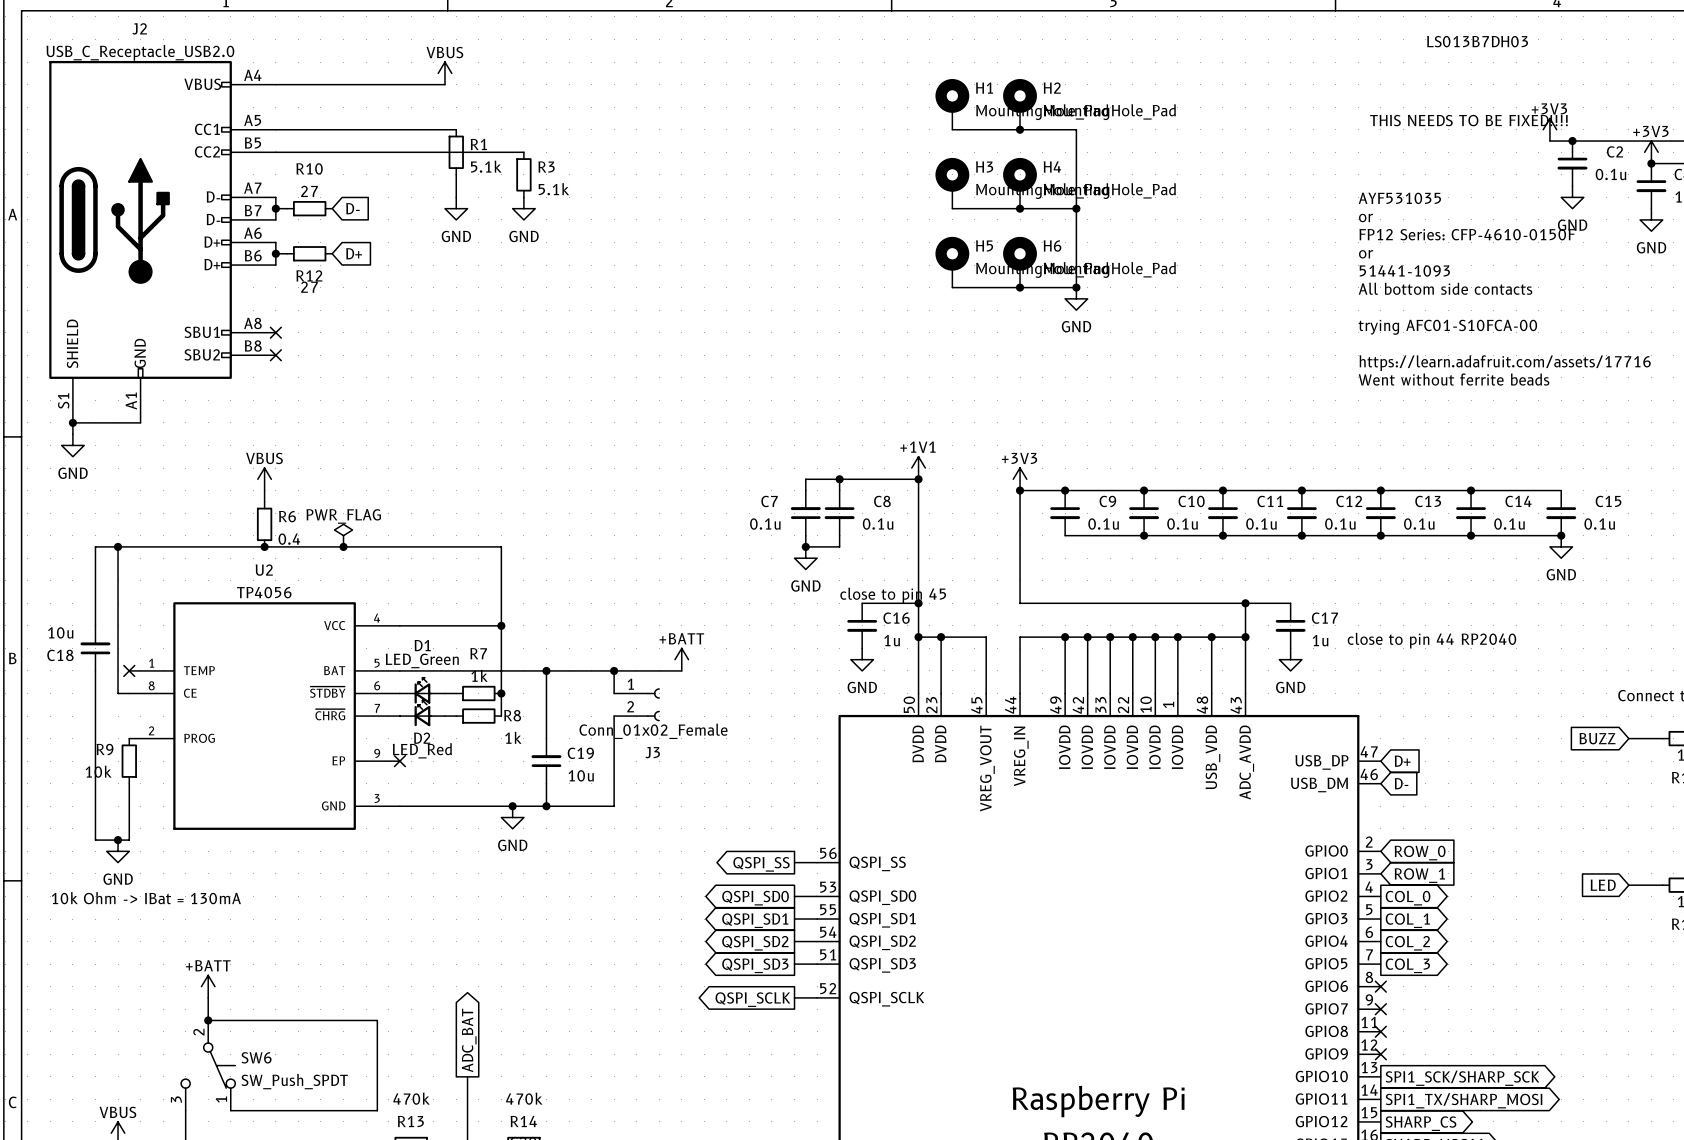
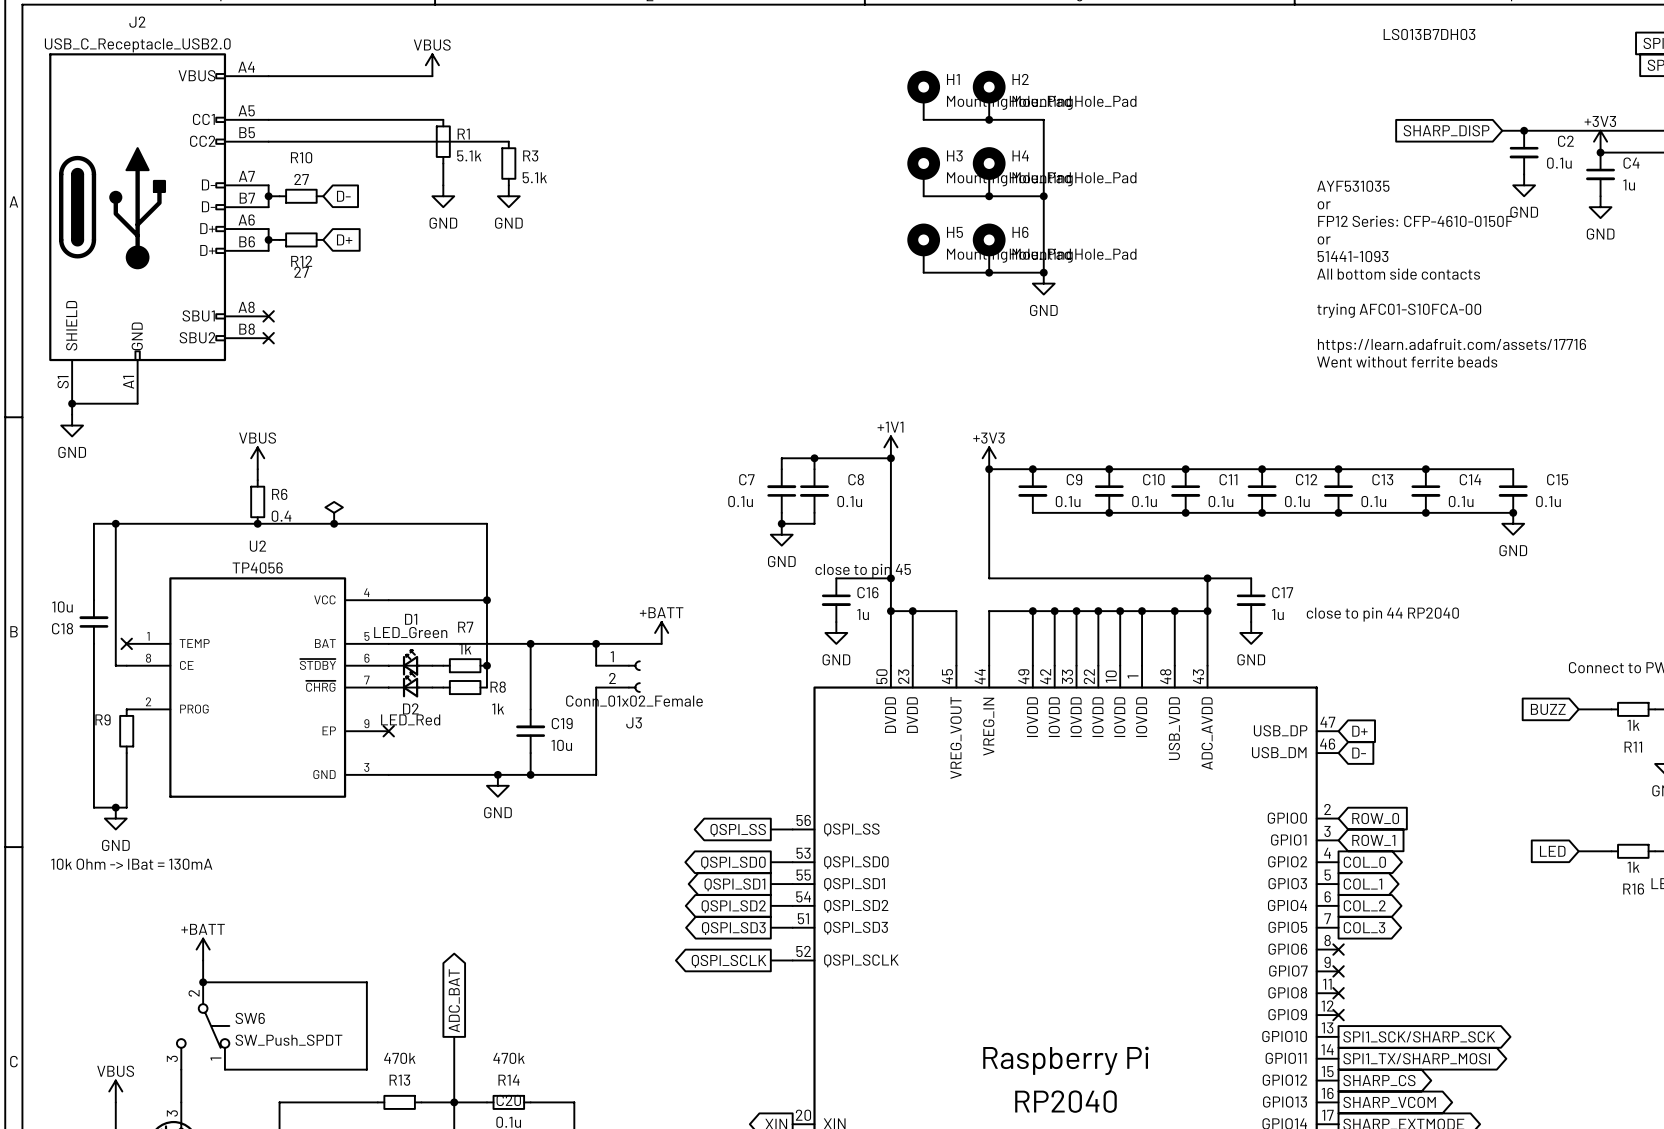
text: THIS NEEDS TO BE FIXED!!!! (1468, 120) -> none
power symbol: +3V3 (1549, 129) -> none
global label: none -> SHARP_DISP (1446, 130)
power symbol text: PWR_FLAG (343, 516) -> none
R9 value: 10k (98, 771) -> none

